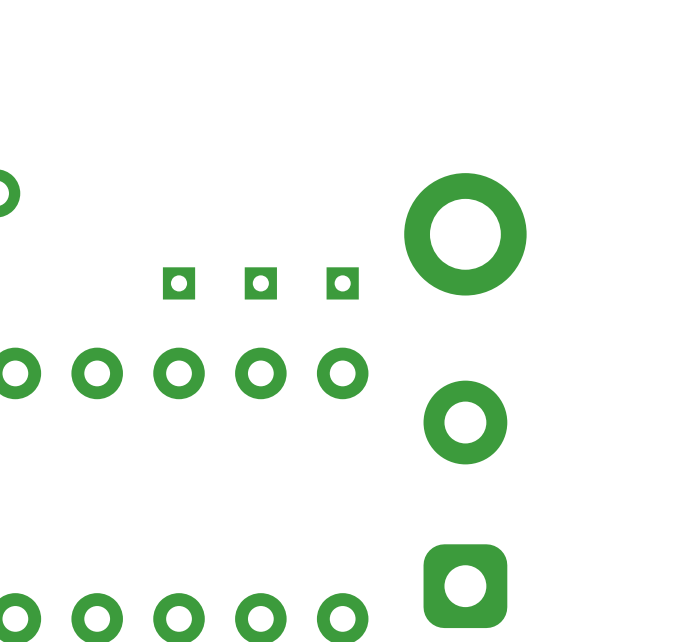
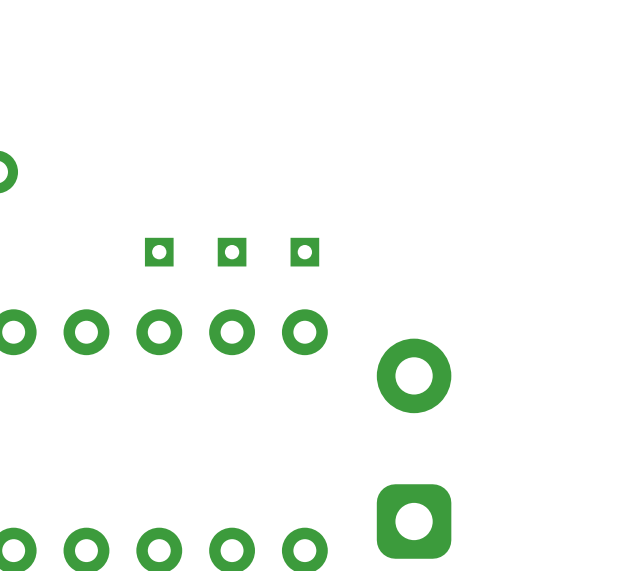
part: (465, 234) -> none

